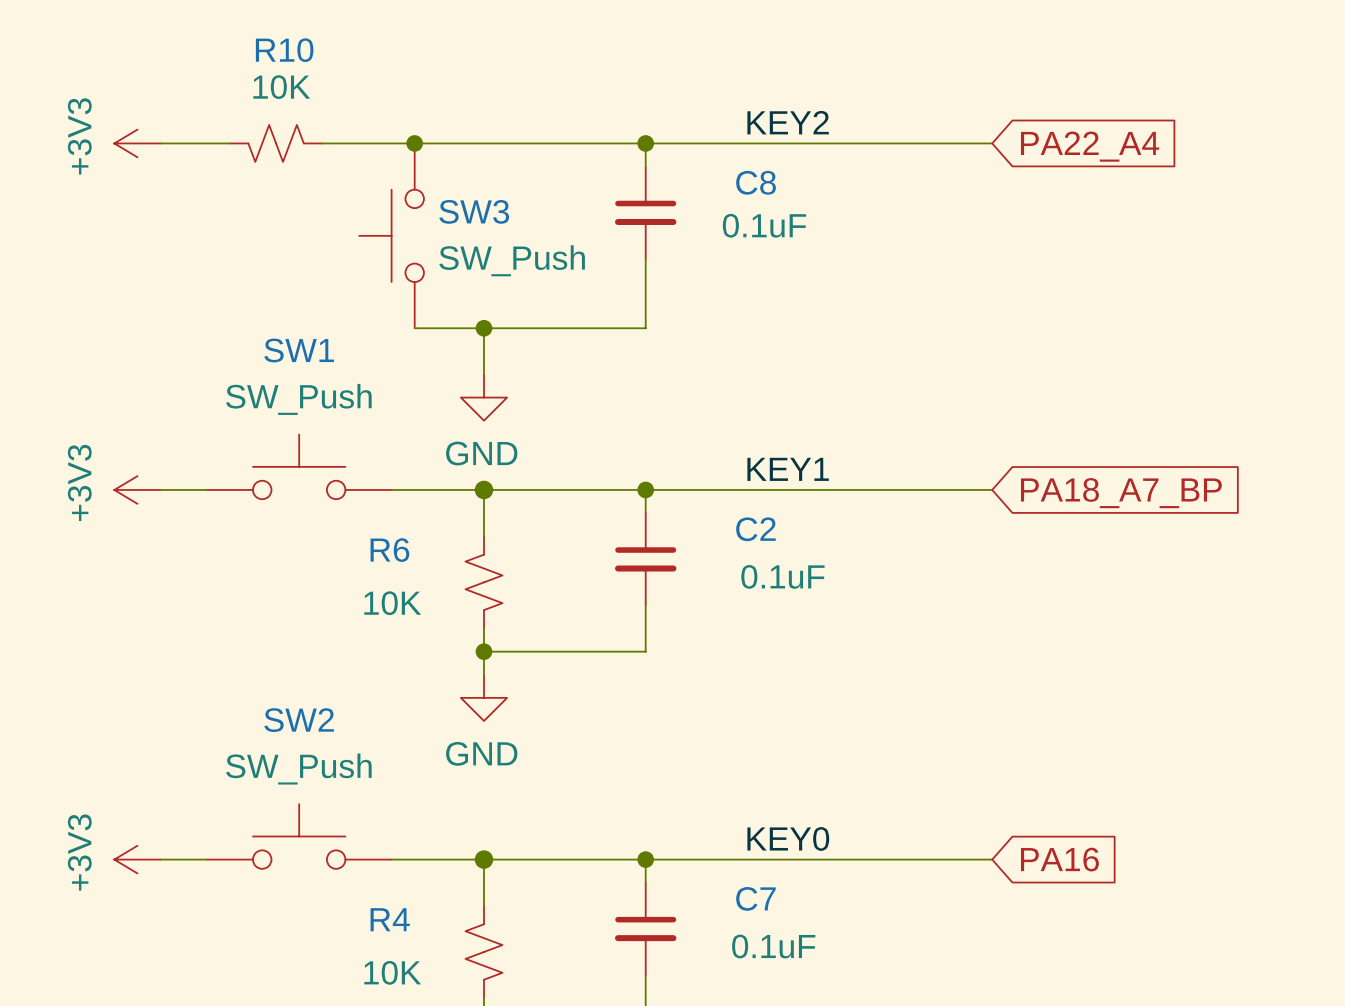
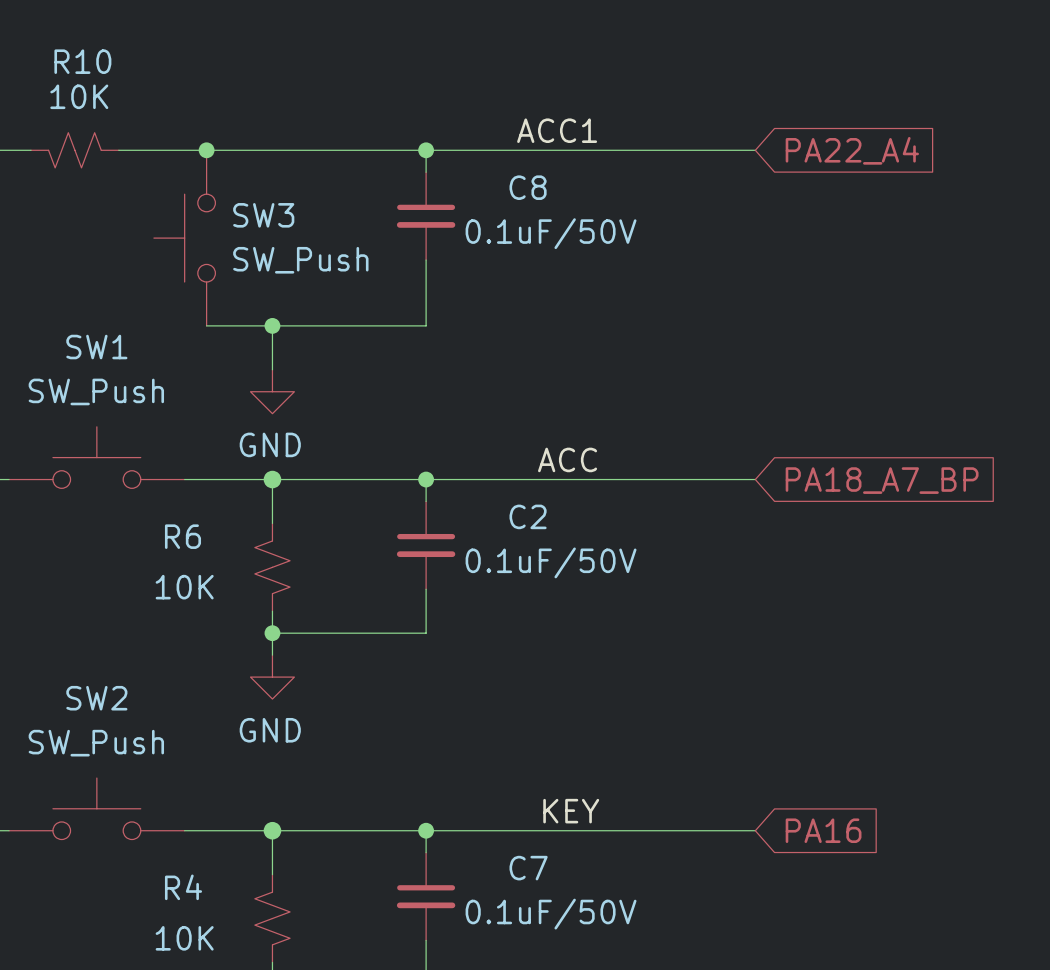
label: KEY2 (788, 122) -> ACC1 (557, 130)
C8 value: 0.1uF (764, 225) -> 0.1uF/50V (551, 233)
label: KEY1 (788, 469) -> ACC (567, 459)
C2 value: 0.1uF (782, 576) -> 0.1uF/50V (551, 562)
label: KEY0 (788, 838) -> KEY (571, 811)
C7 value: 0.1uF (773, 946) -> 0.1uF/50V (551, 914)

